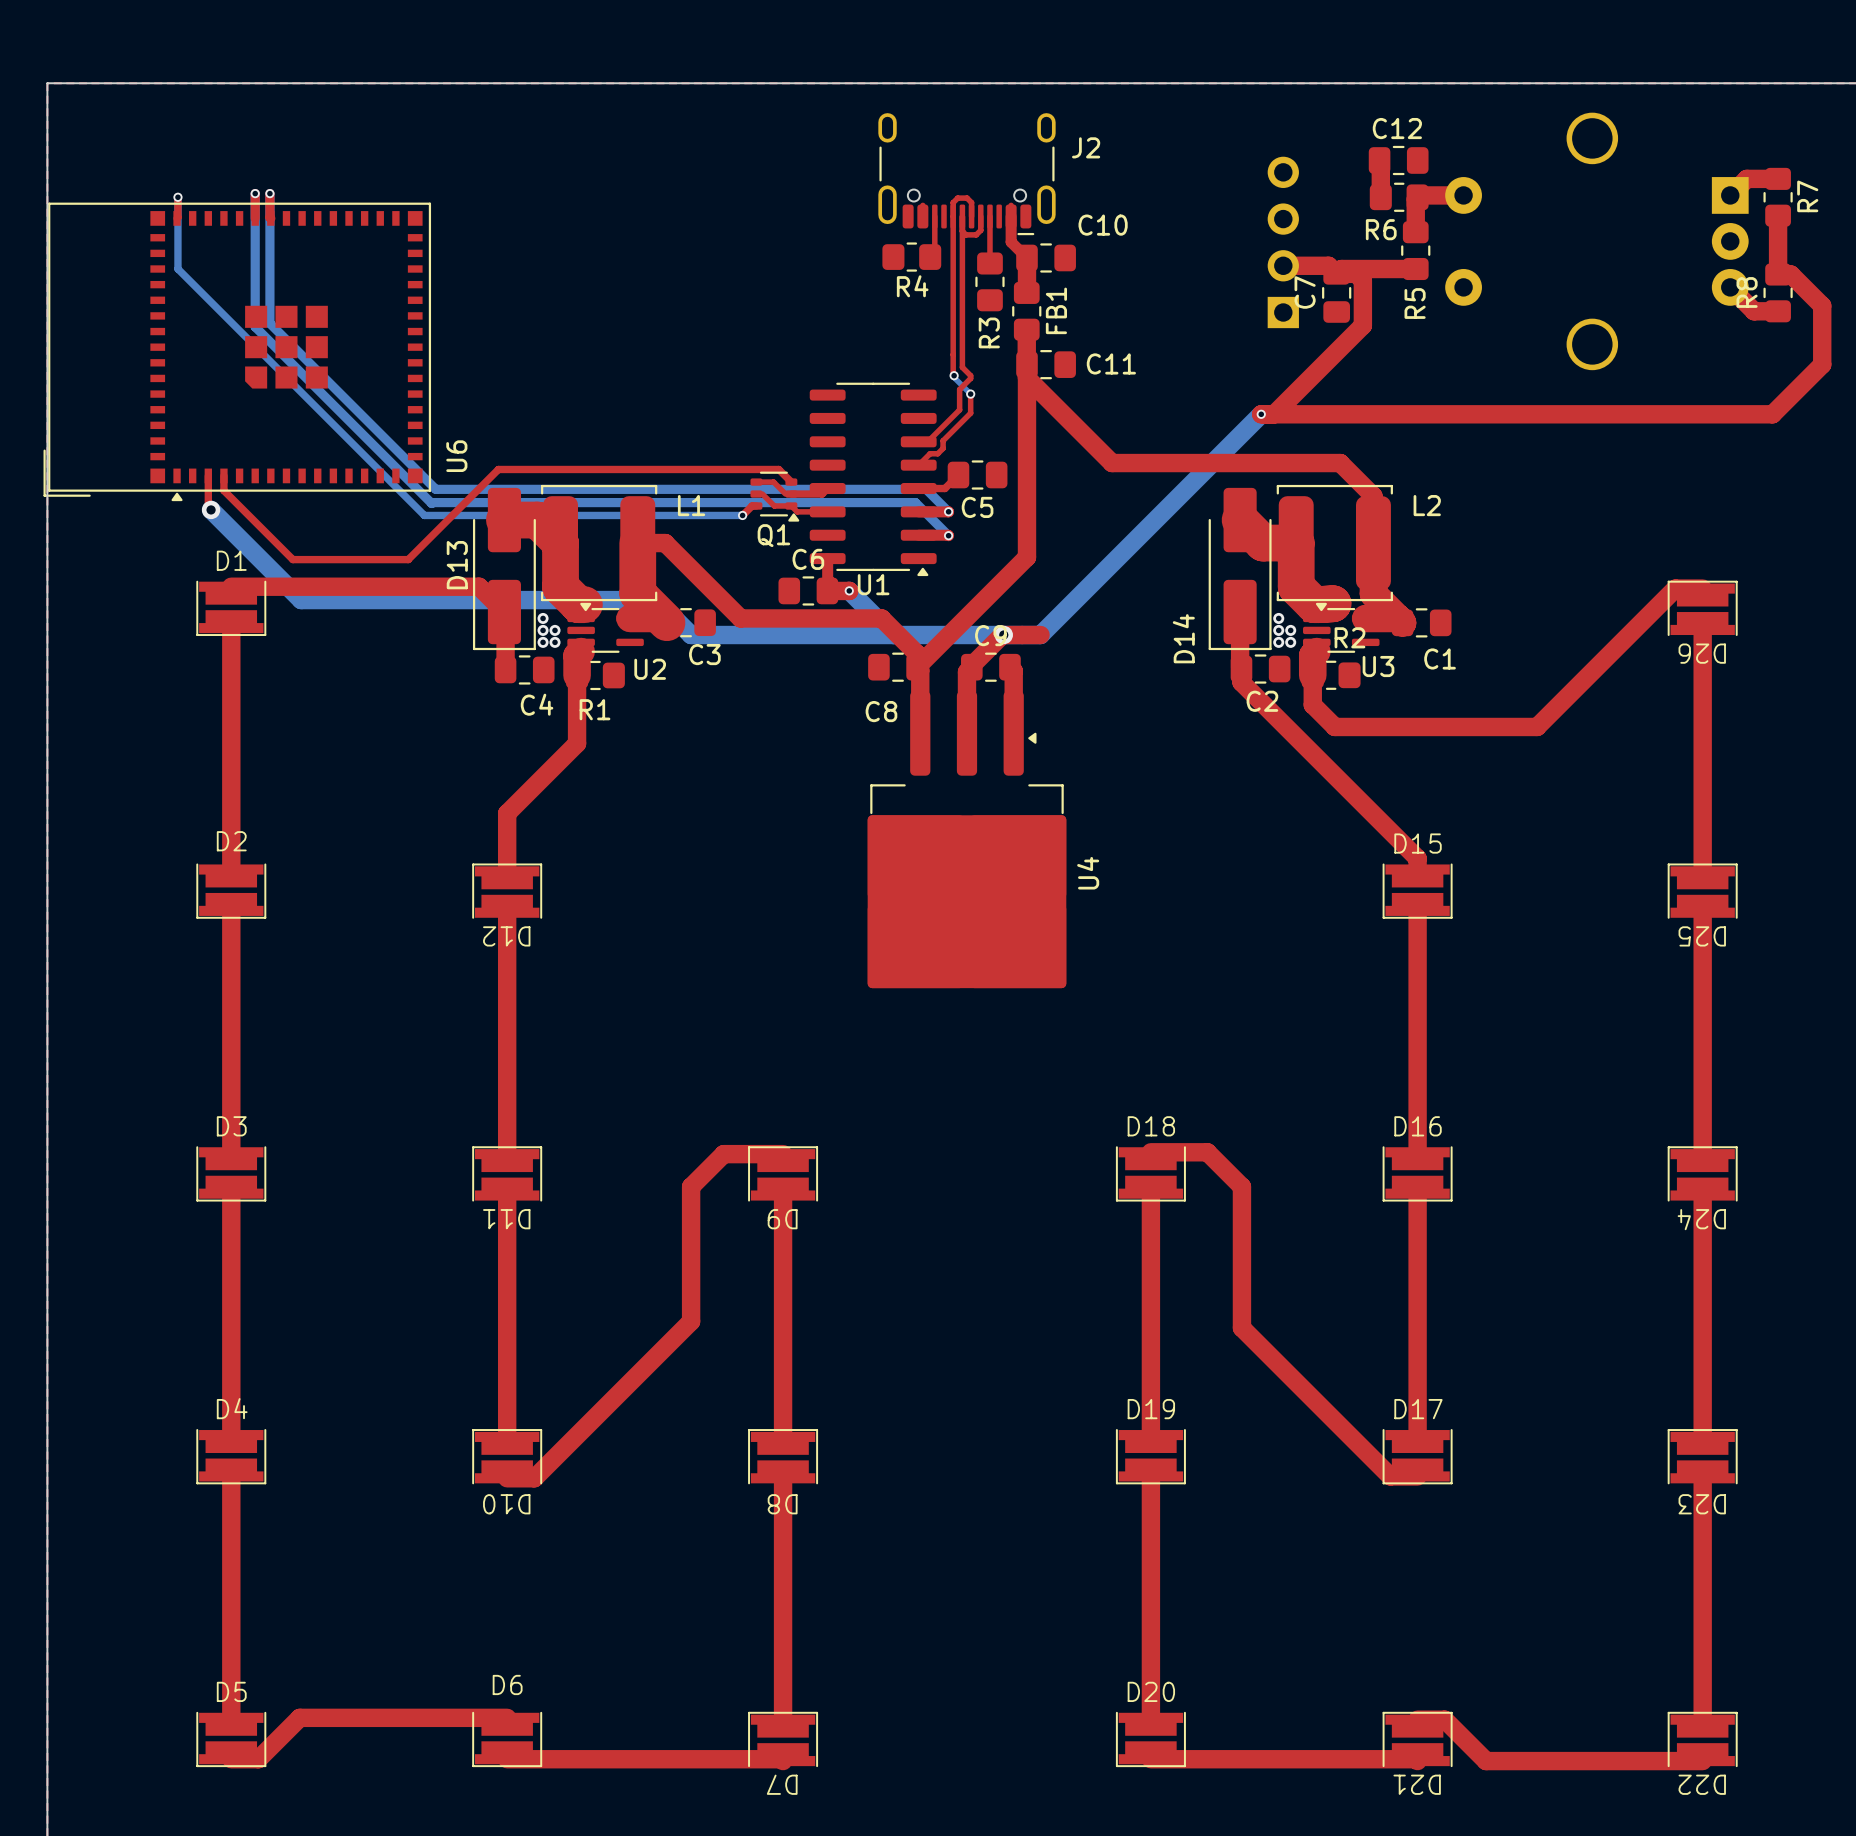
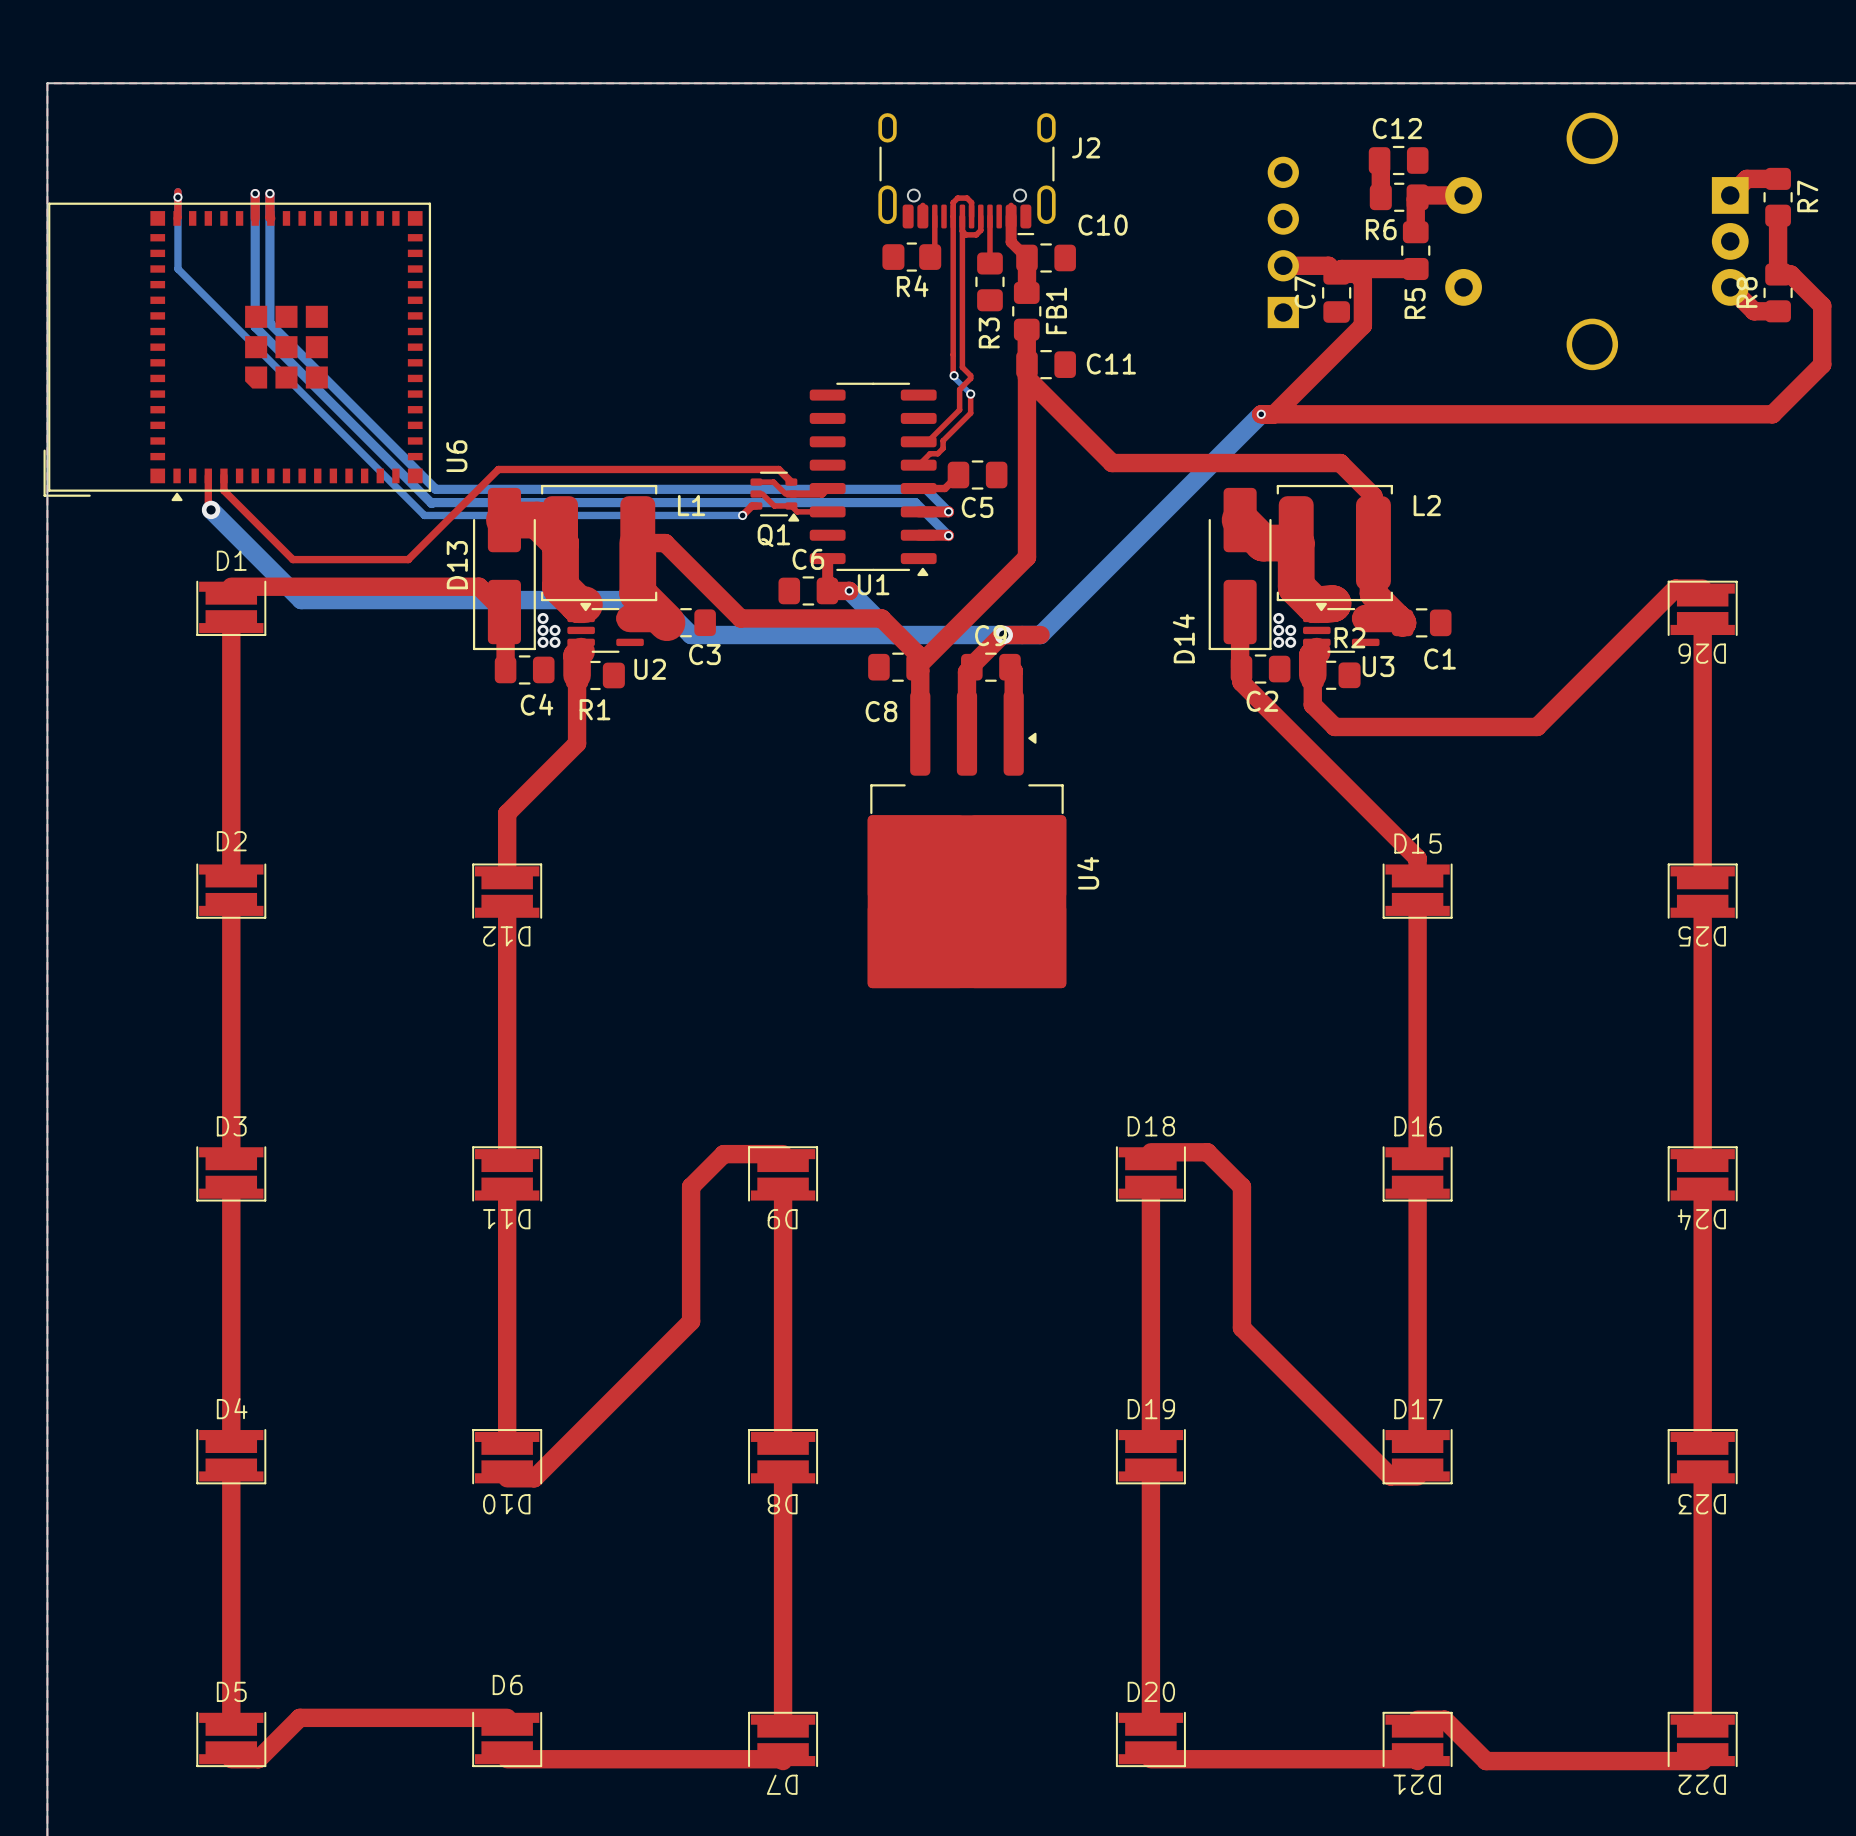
top track: none -> (177, 191) (177, 197)

